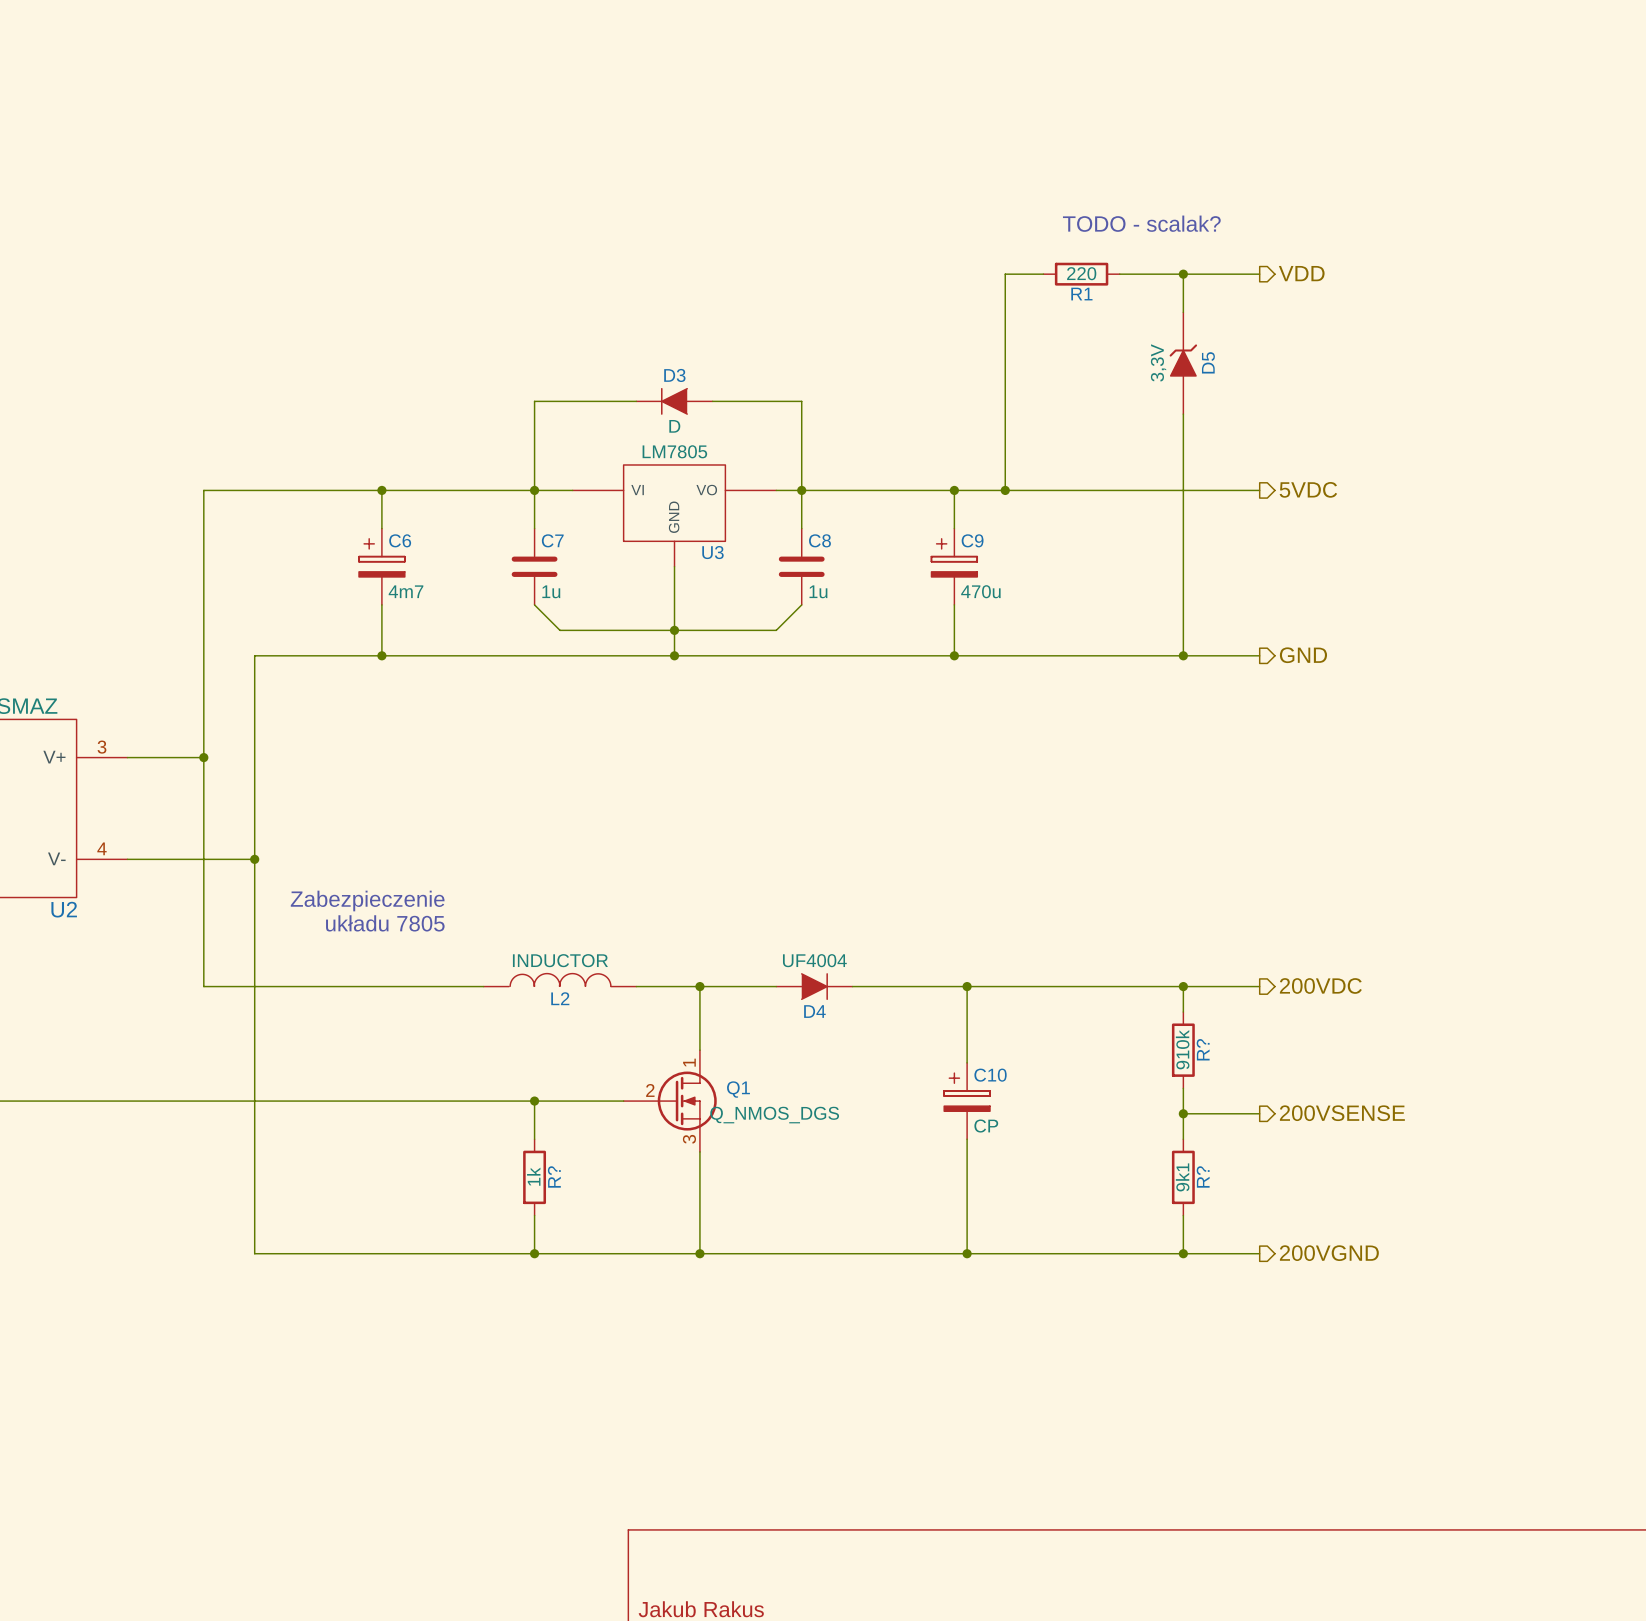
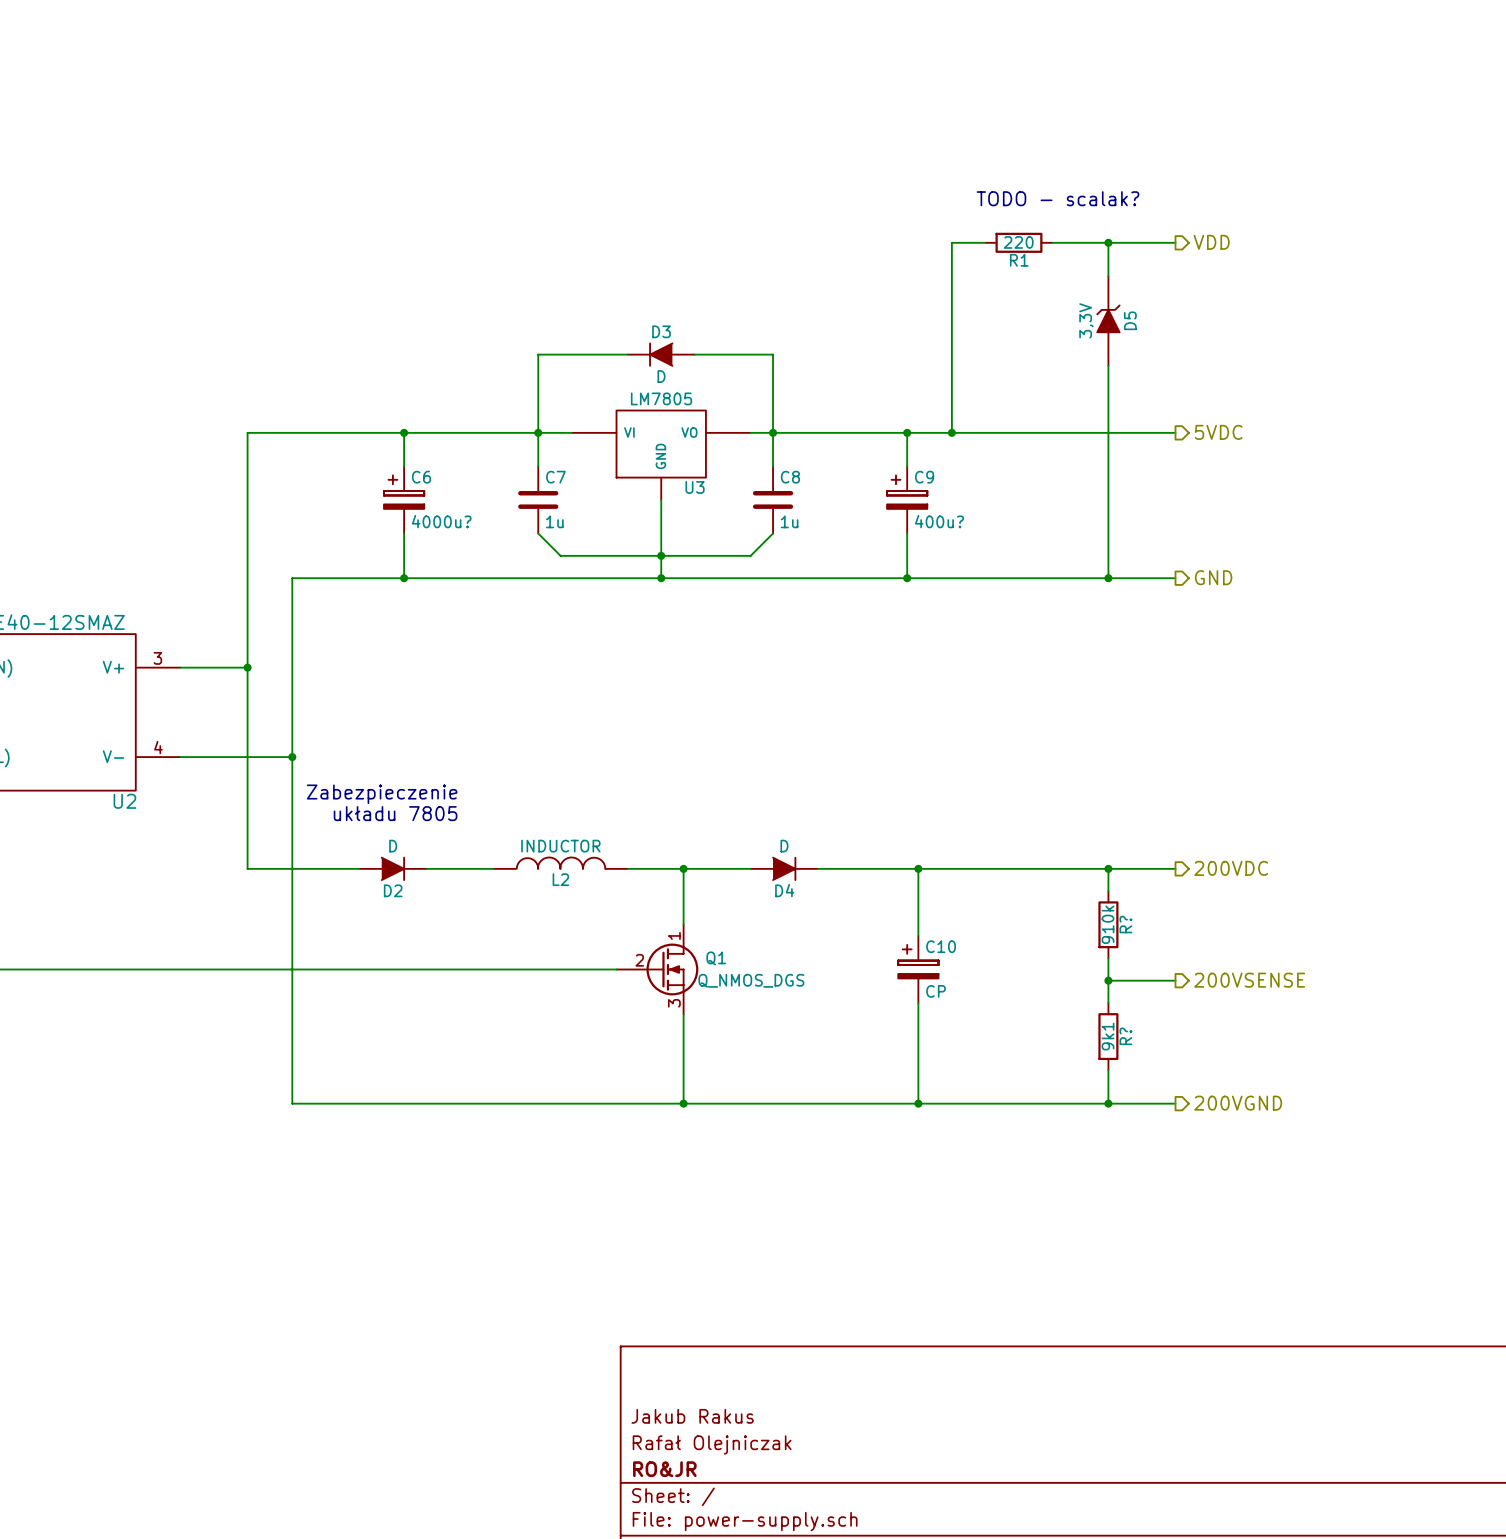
C6 value: 4m7 (406, 591) -> 4000u? (441, 521)
C9 value: 470u (980, 591) -> 400u? (939, 521)
D4 value: UF4004 (814, 960) -> D (784, 846)
D2: none -> D (392, 868)
wire: (534, 1101) (534, 1139) -> none
junction: (534, 1101) -> none
R?: 1k (534, 1177) -> none
wire: (534, 1215) (534, 1253) -> none
junction: (534, 1253) -> none

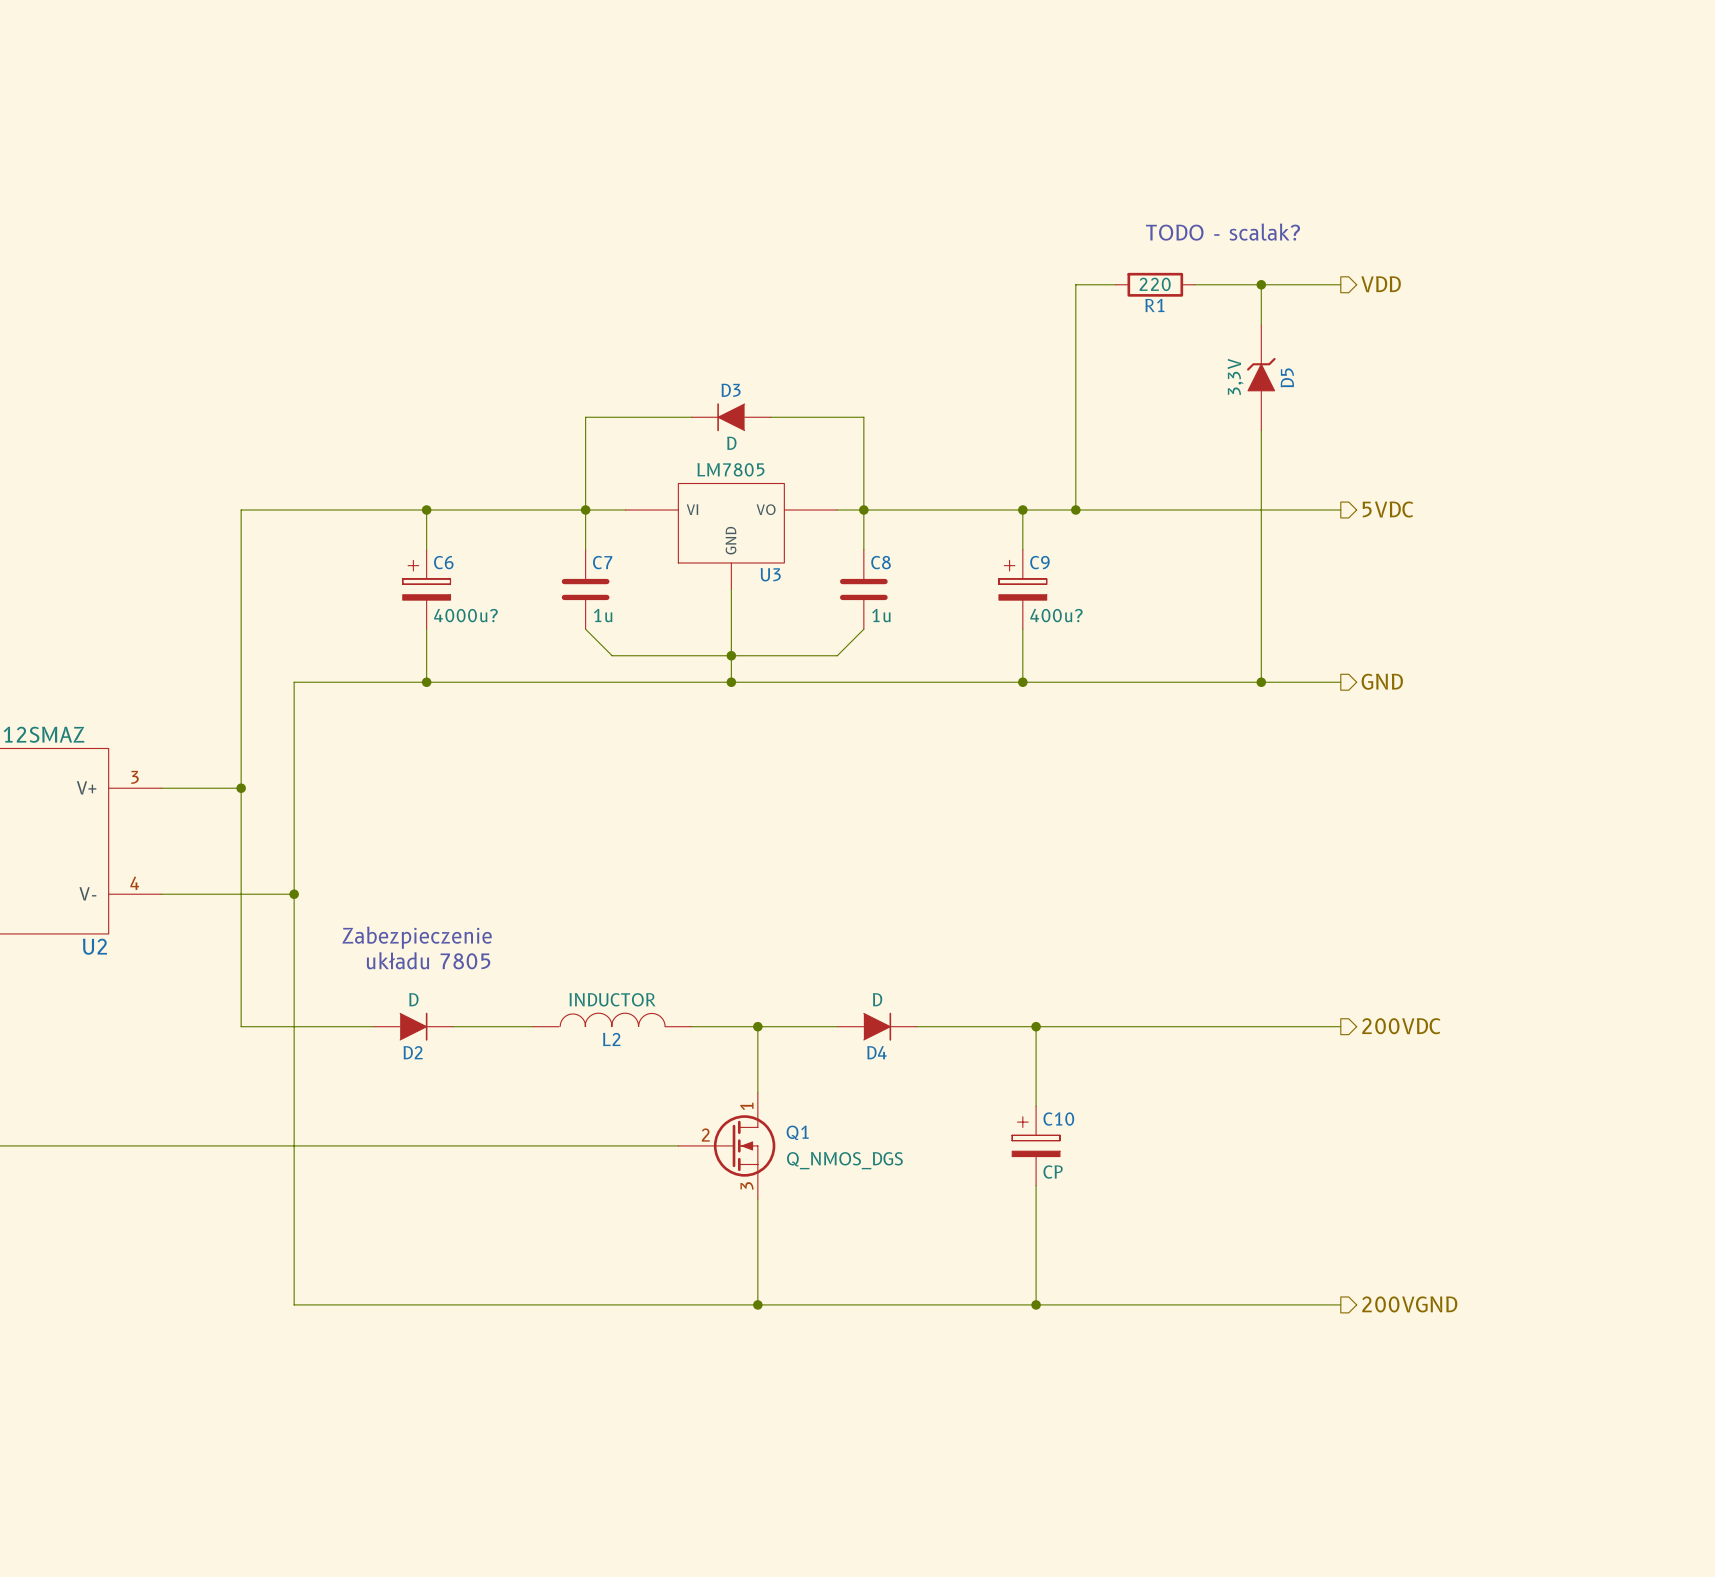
wire: (1108, 868) (1108, 891) -> none
junction: (1108, 868) -> none
R?: 910k (1108, 924) -> none
wire: (1108, 958) (1108, 1003) -> none
wire: (1108, 980) (1175, 980) -> none
junction: (1108, 980) -> none
hierarchical label: 200VSENSE (1249, 980) -> none
R?: 9k1 (1108, 1036) -> none
wire: (1108, 1070) (1108, 1103) -> none
junction: (1108, 1103) -> none

